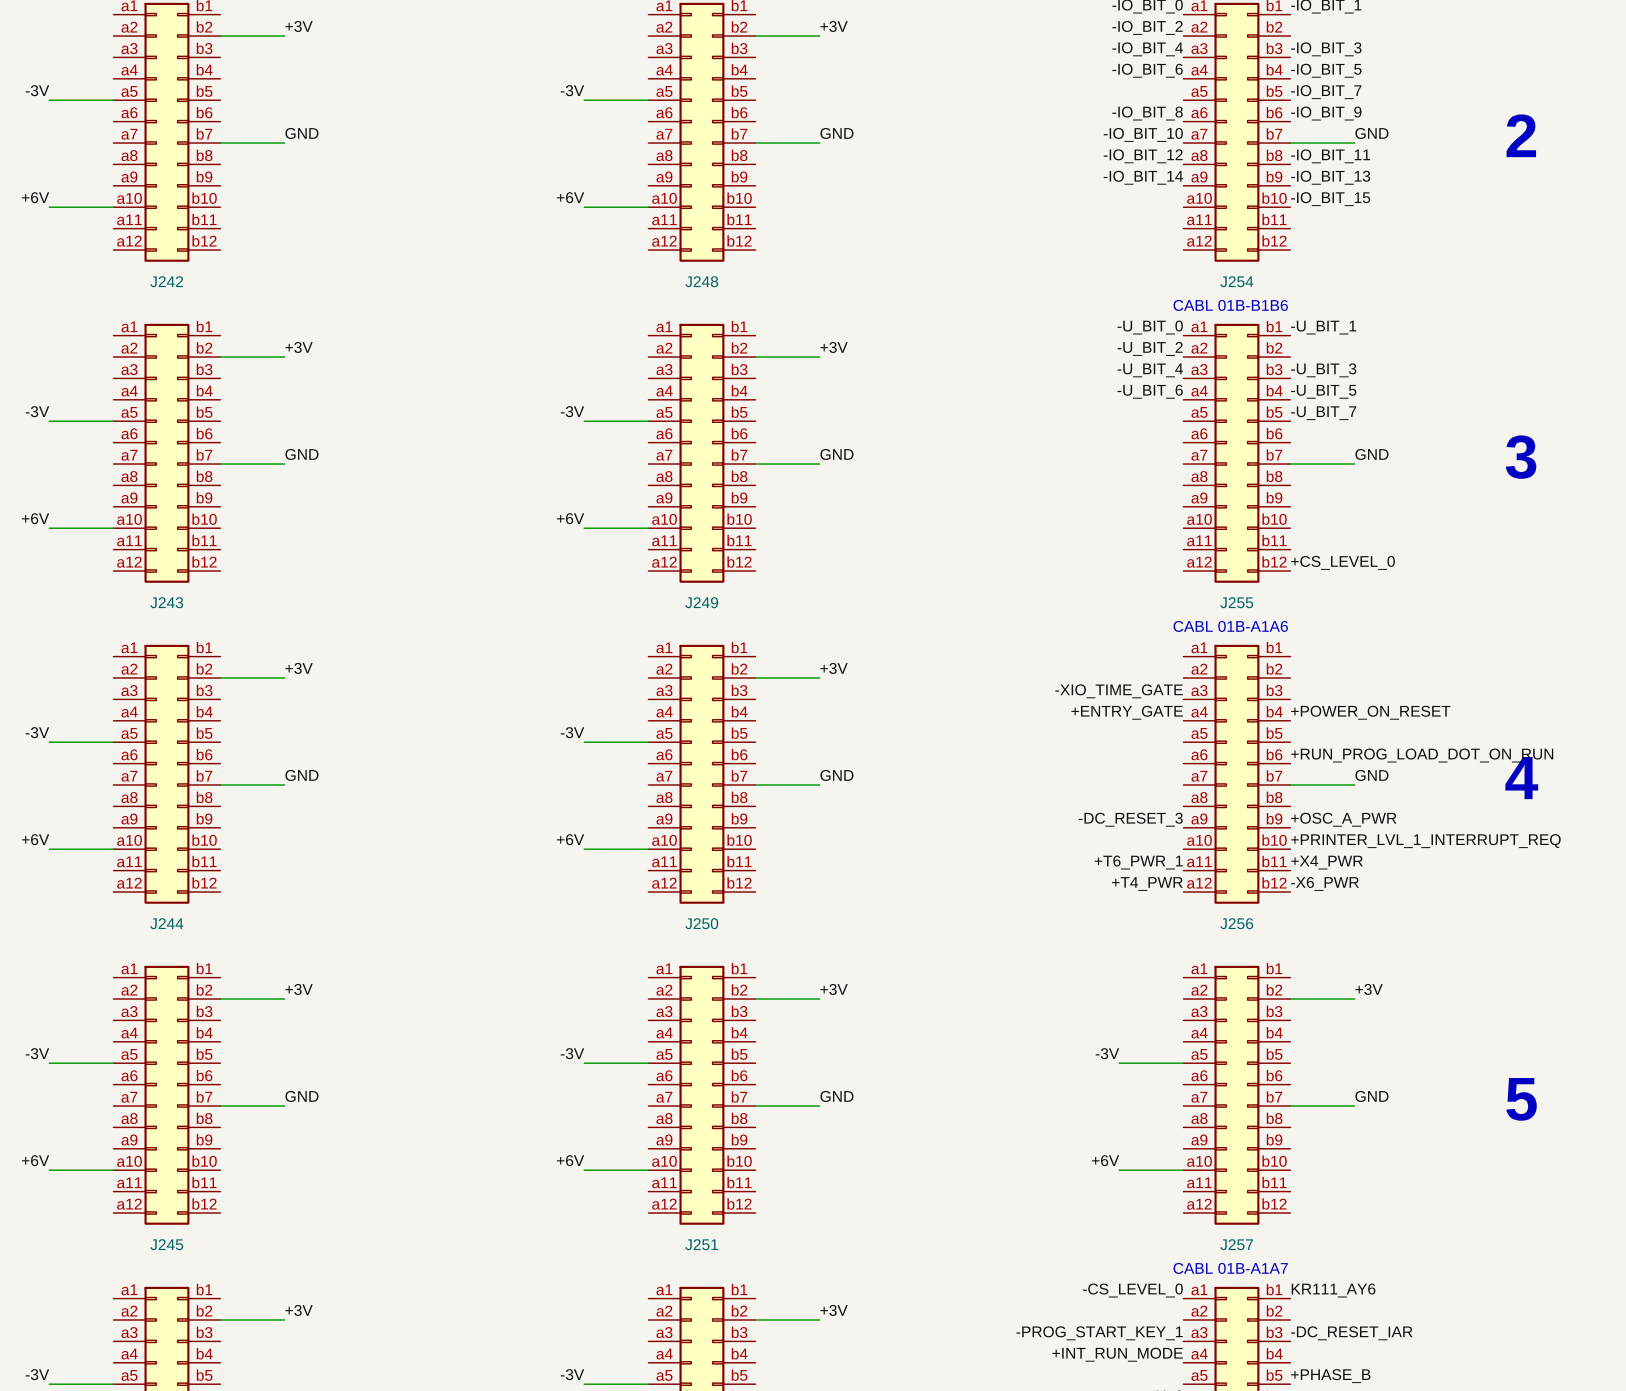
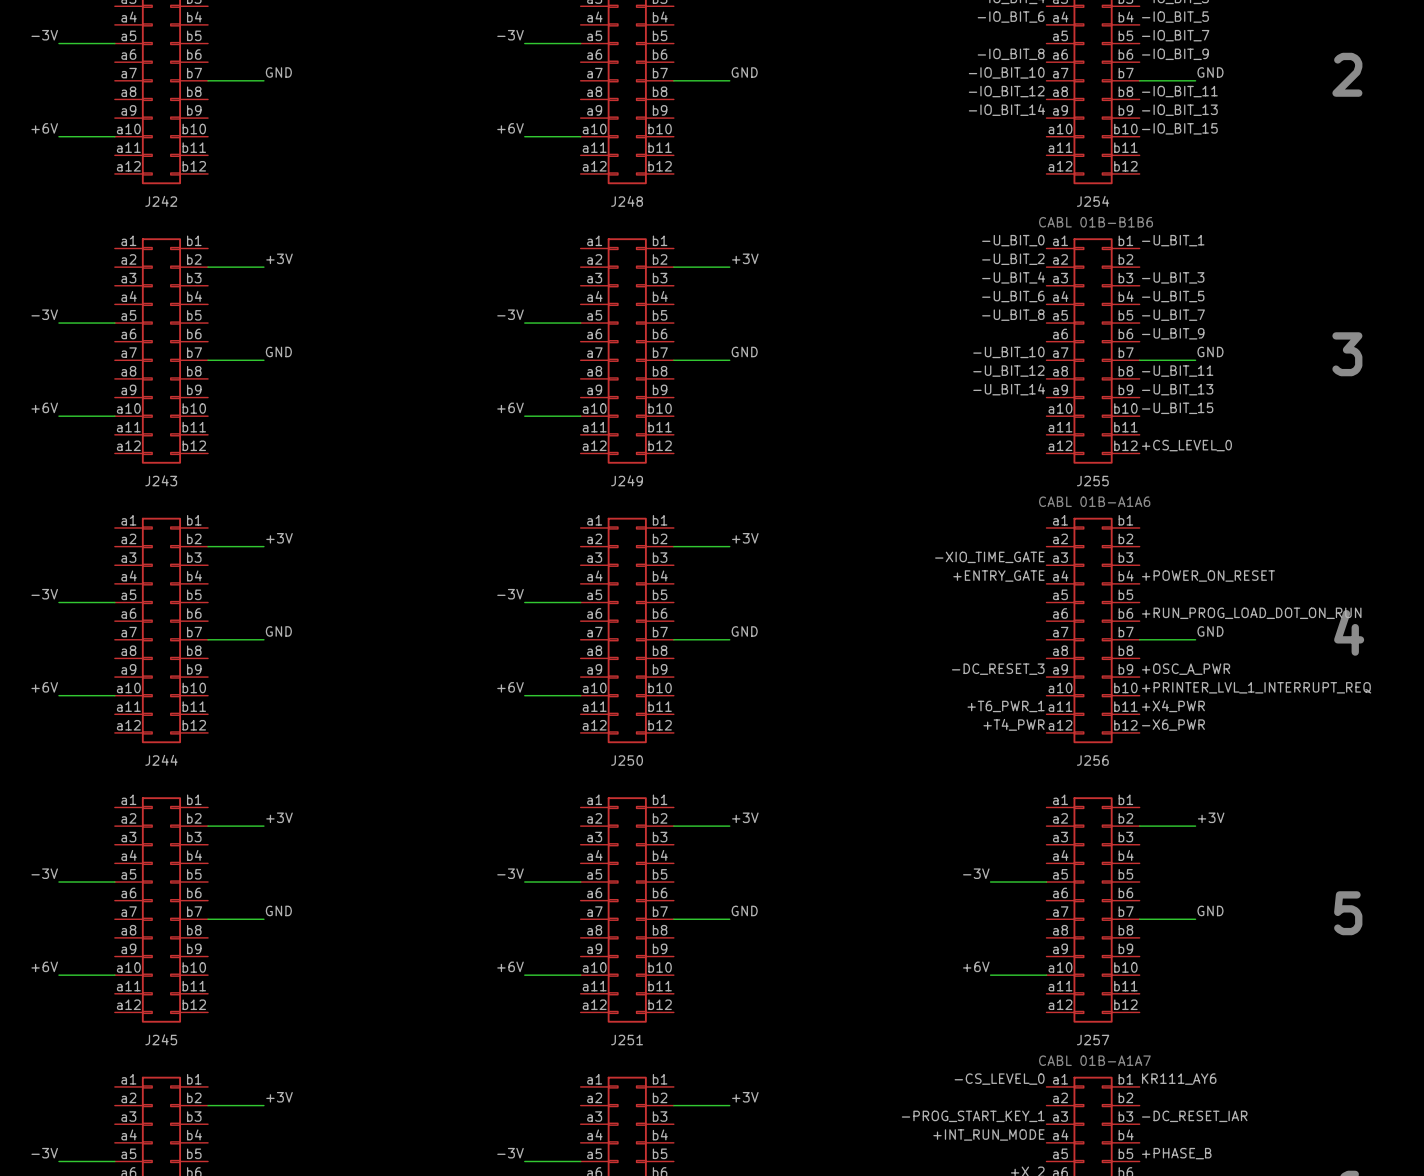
label: none -> -U_BIT_8 (1013, 315)
label: none -> -U_BIT_9 (1173, 333)
label: none -> -U_BIT_10 (1008, 352)
label: none -> -U_BIT_12 (1008, 371)
label: none -> -U_BIT_11 (1177, 371)
label: none -> -U_BIT_14 (1009, 389)
label: none -> -U_BIT_13 (1177, 389)
label: none -> -U_BIT_15 (1177, 408)

